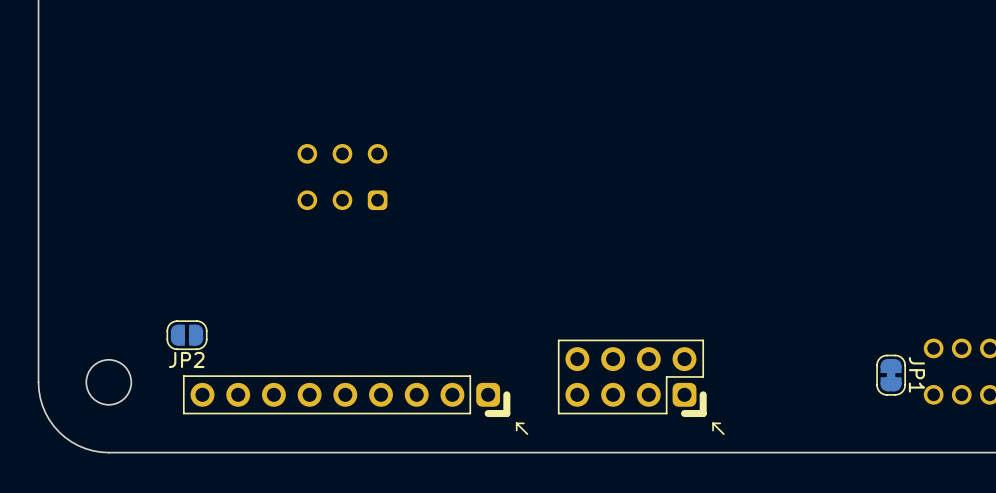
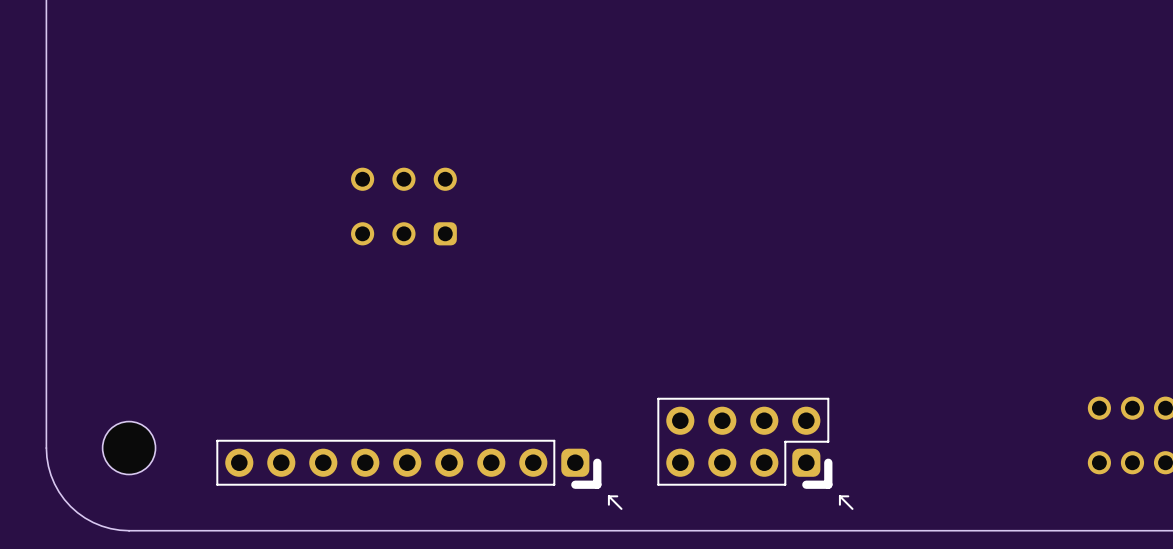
JP2: (187, 335) -> none
JP1: (891, 375) -> none

